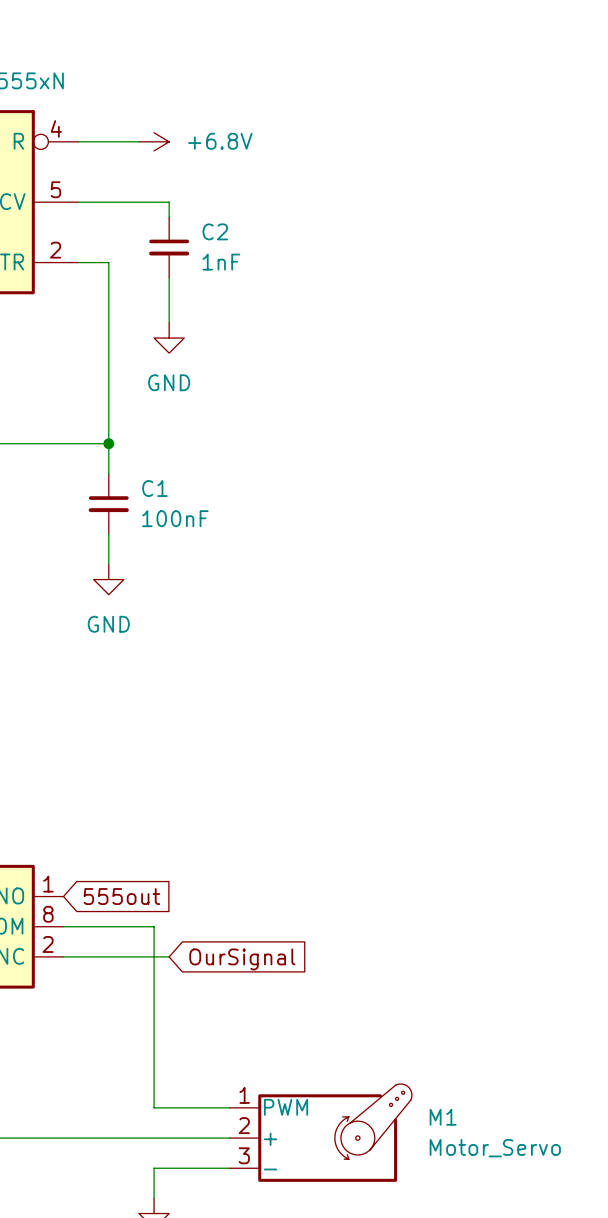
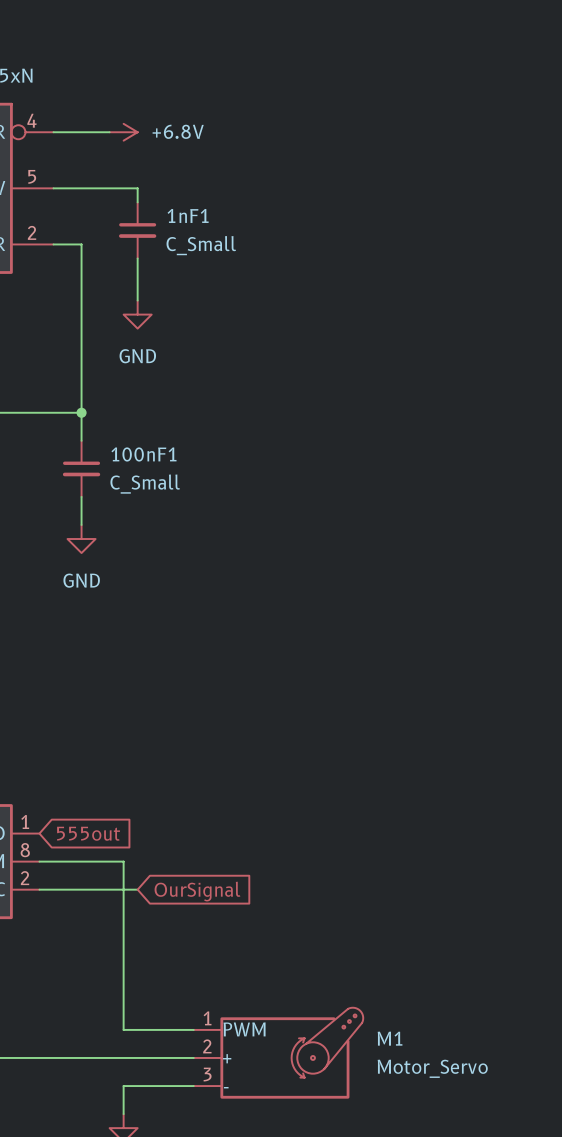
C2 name: C2 (215, 231) -> 1nF1 (188, 215)
C2 value: 1nF (221, 262) -> C_Small (201, 245)
C1 name: C1 (154, 488) -> 100nF1 (143, 454)
C1 value: 100nF (175, 518) -> C_Small (145, 484)

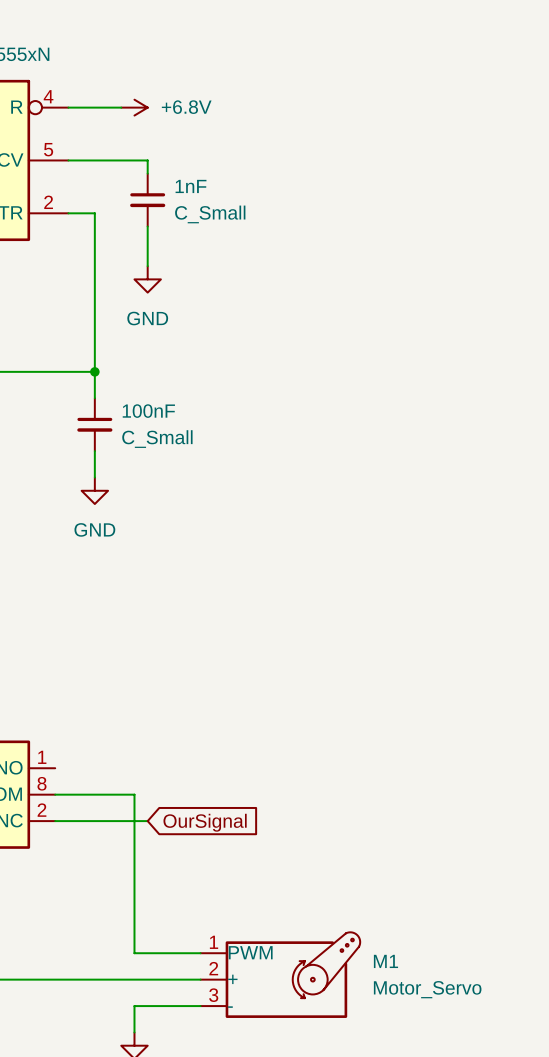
1nF1 name: 1nF1 (188, 215) -> 1nF (191, 186)
100nF1 name: 100nF1 (143, 454) -> 100nF (148, 411)
global label: 555out (88, 833) -> none

